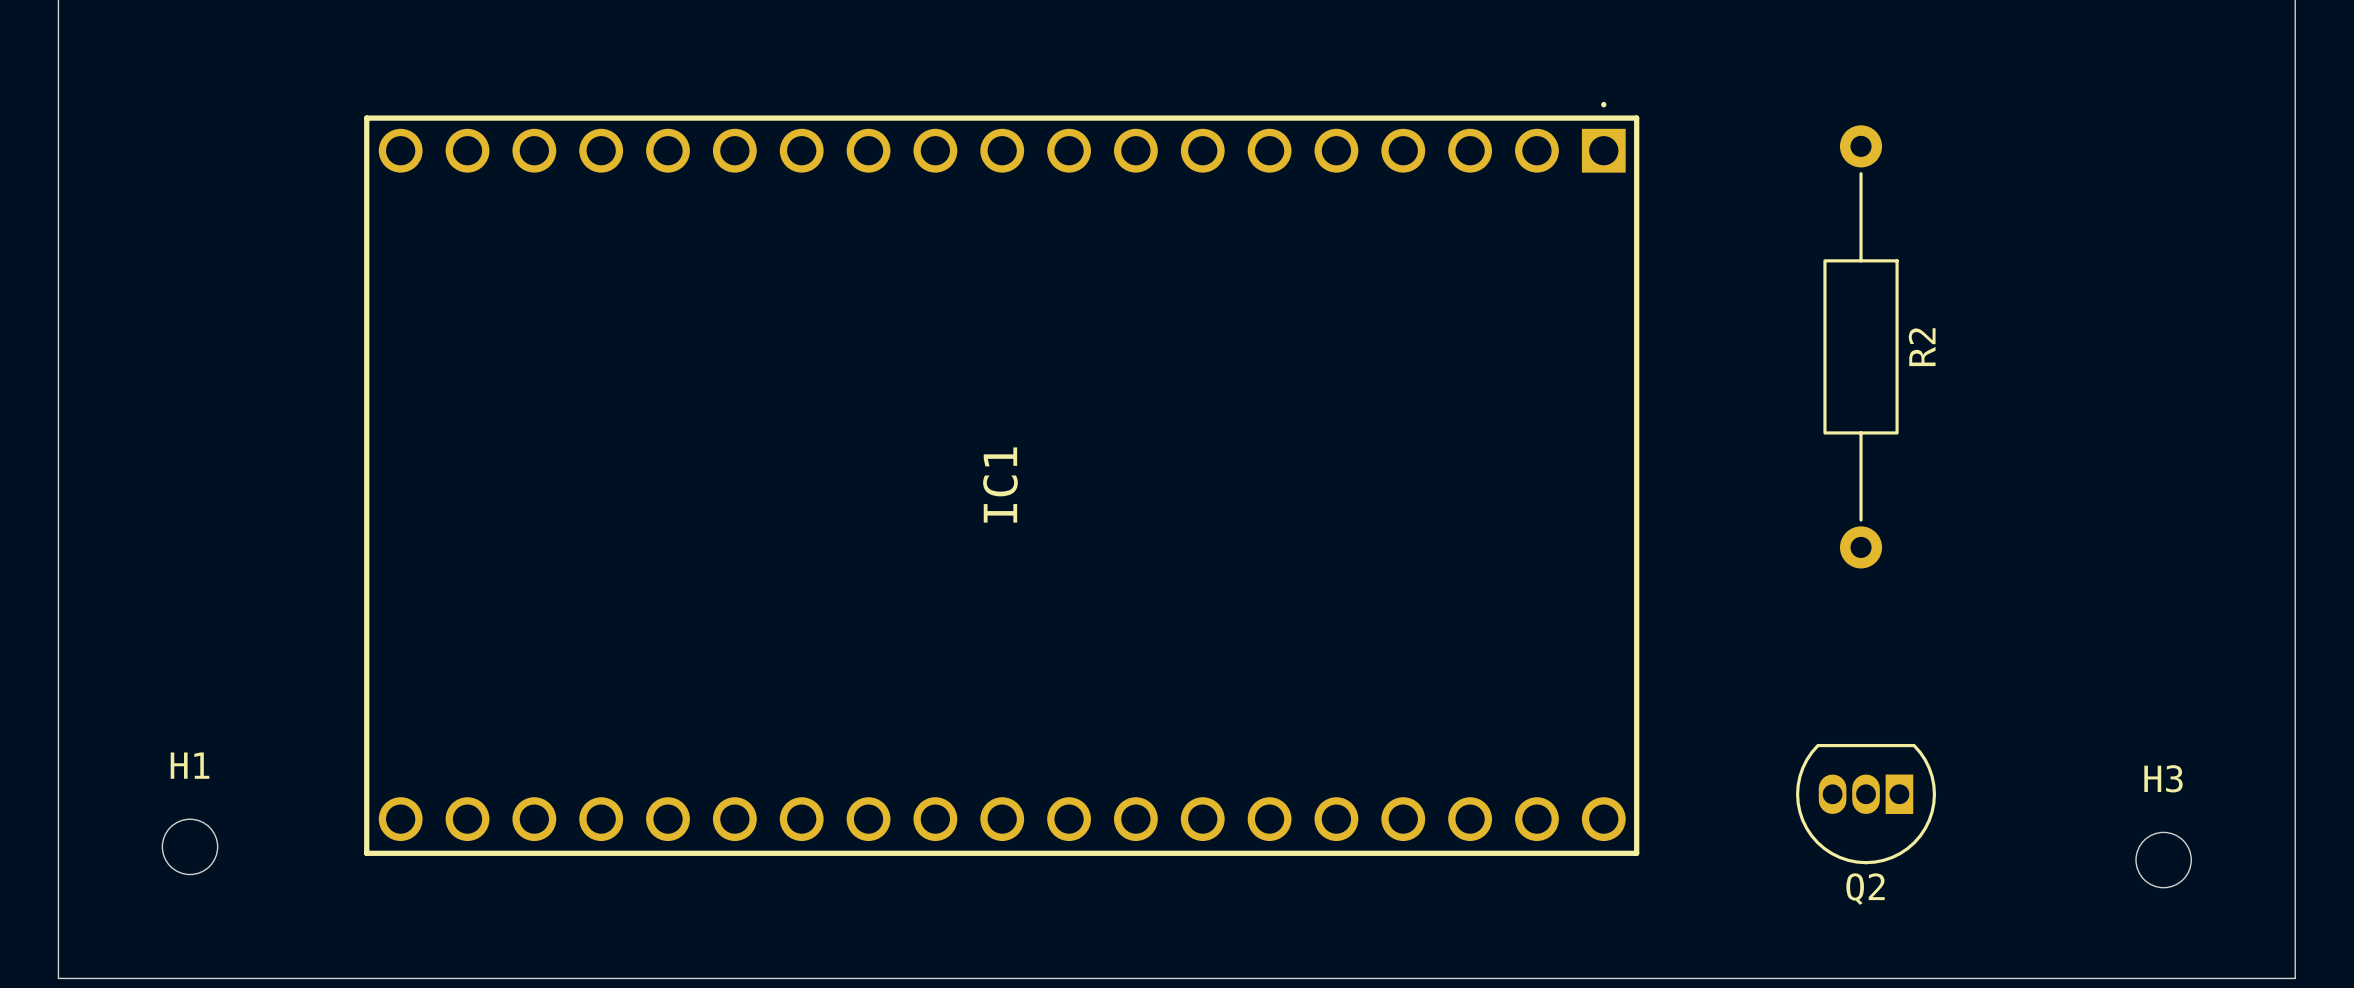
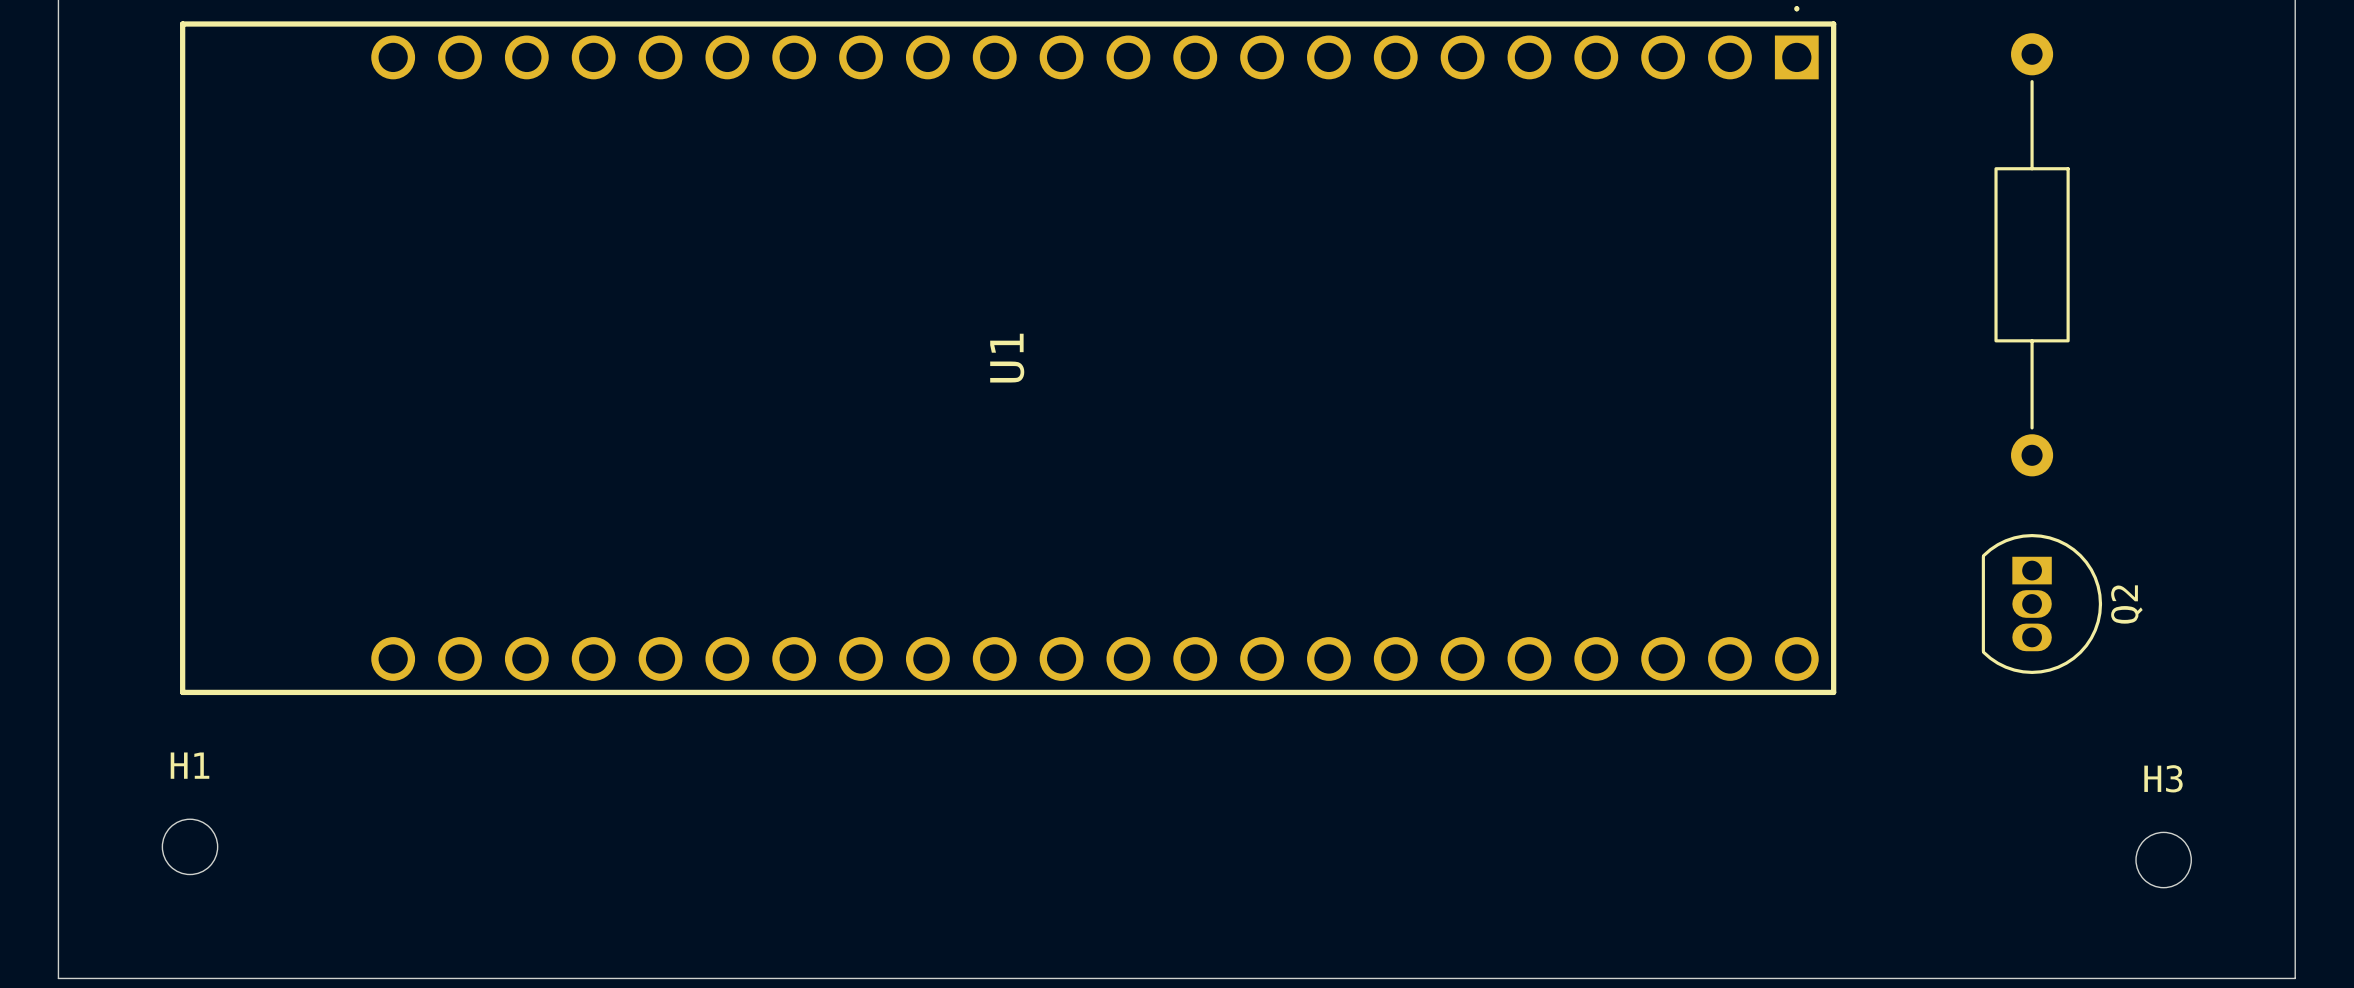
part: none -> (2032, 254)
R2: (1861, 346) -> none
U1: none -> (1008, 350)
IC1: (1001, 478) -> none
Q2 rotation: 0° (1866, 804) -> 90° counterclockwise (2041, 603)
Q2 position: (1866, 804) -> (2041, 603)

